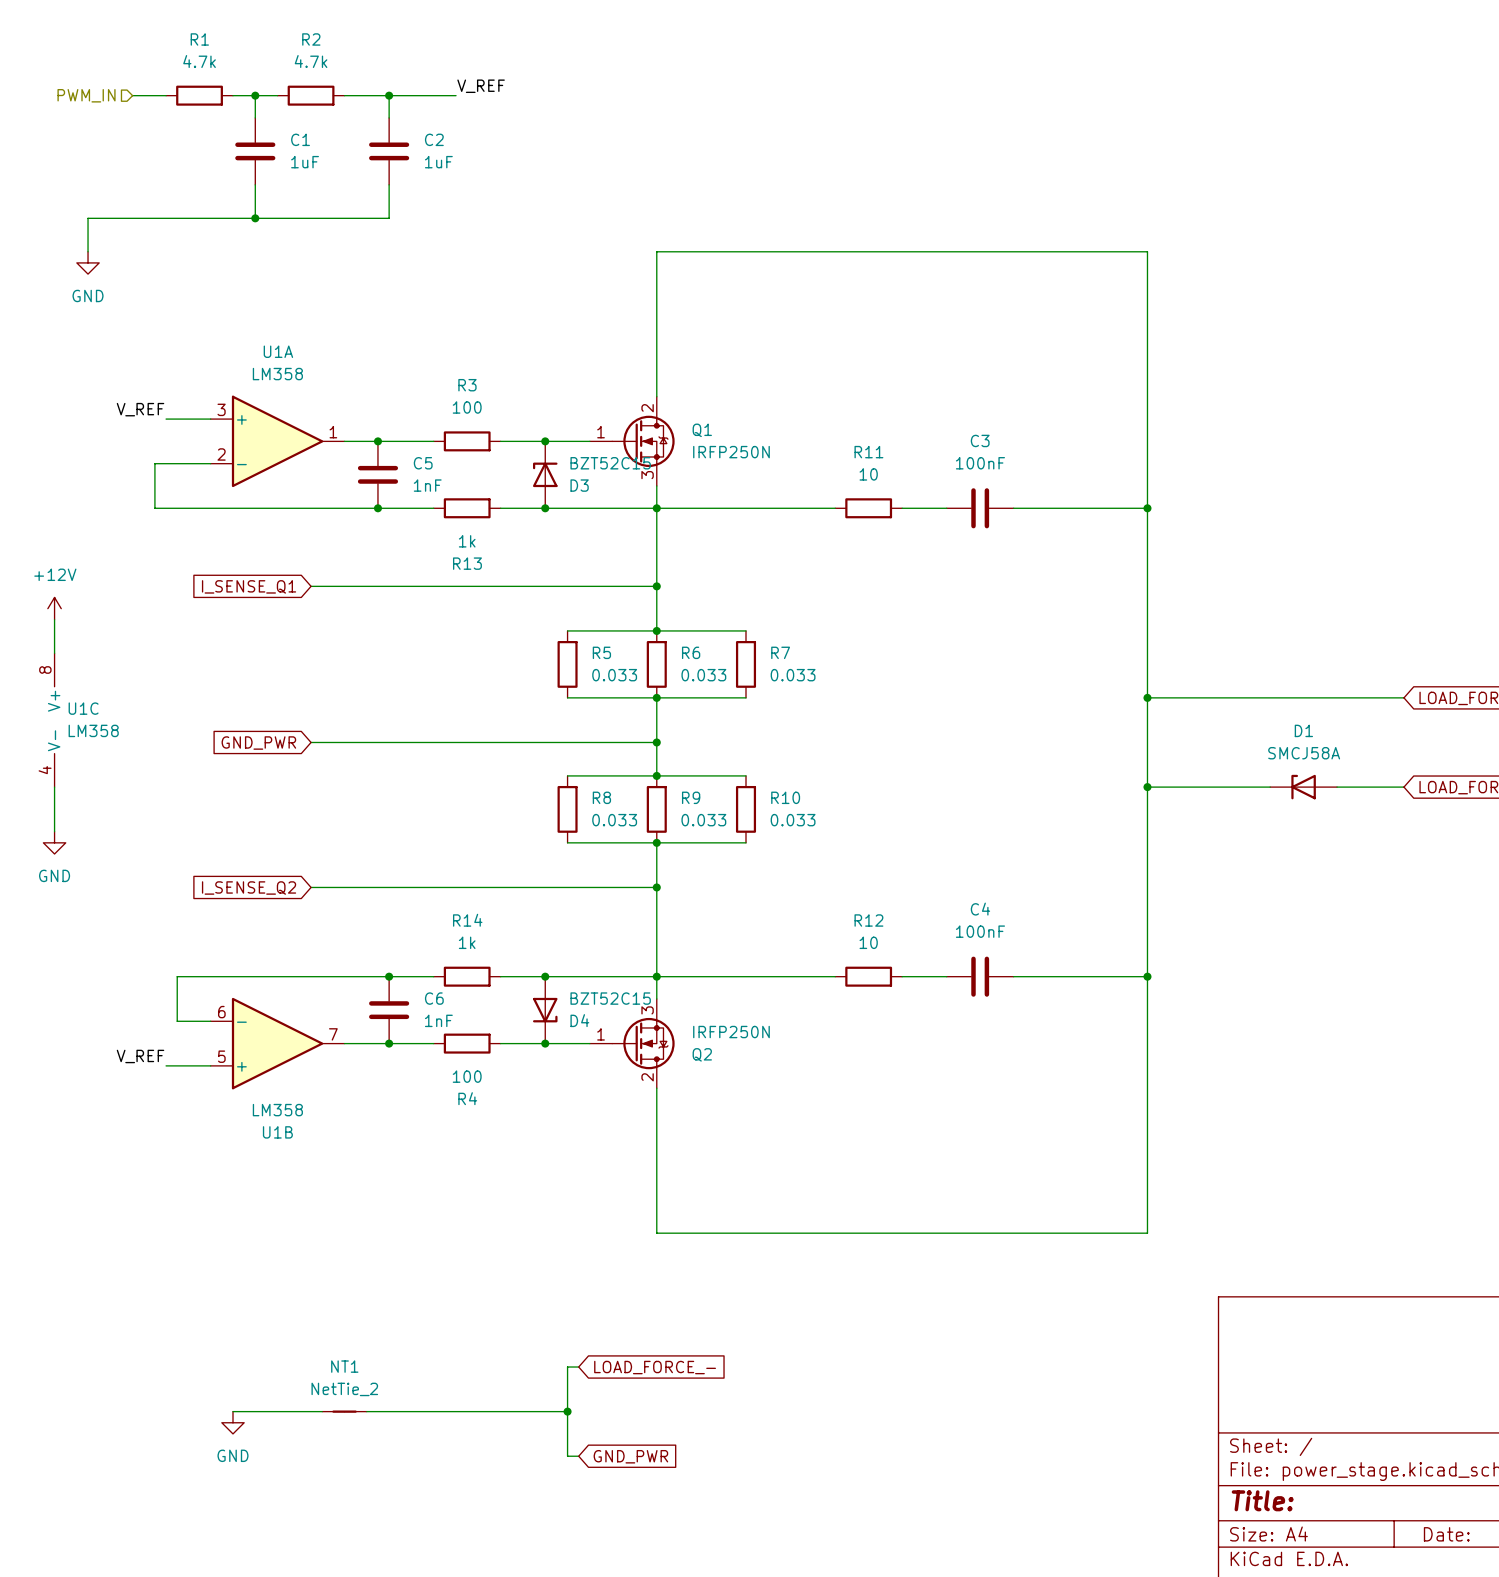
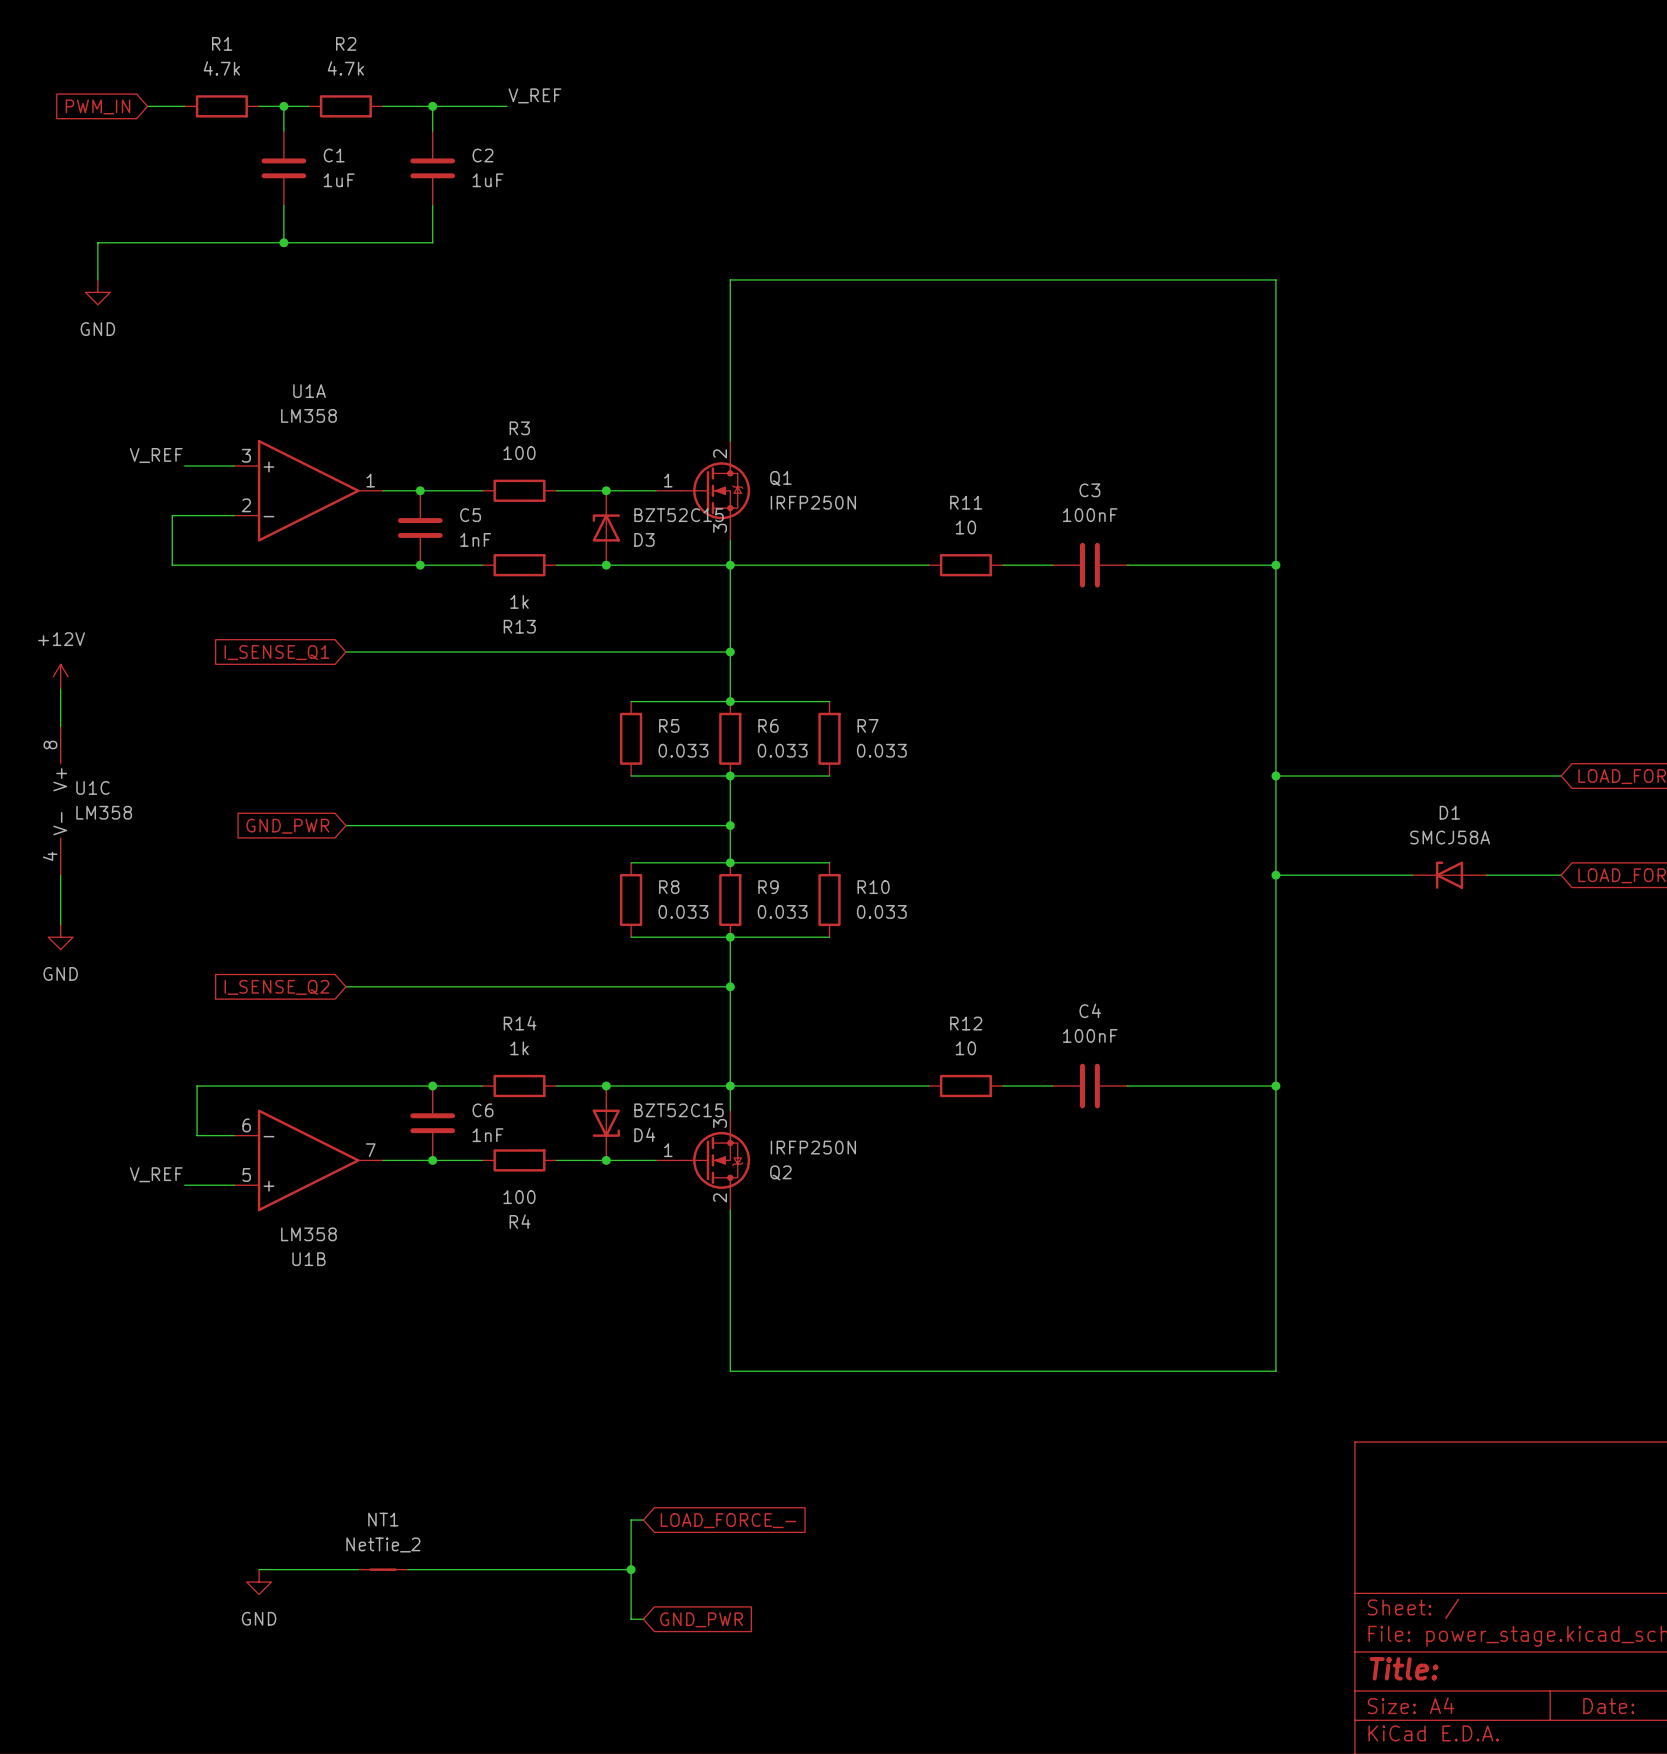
hierarchical label: PWM_IN (86, 95) -> none
global label: none -> PWM_IN (98, 106)

